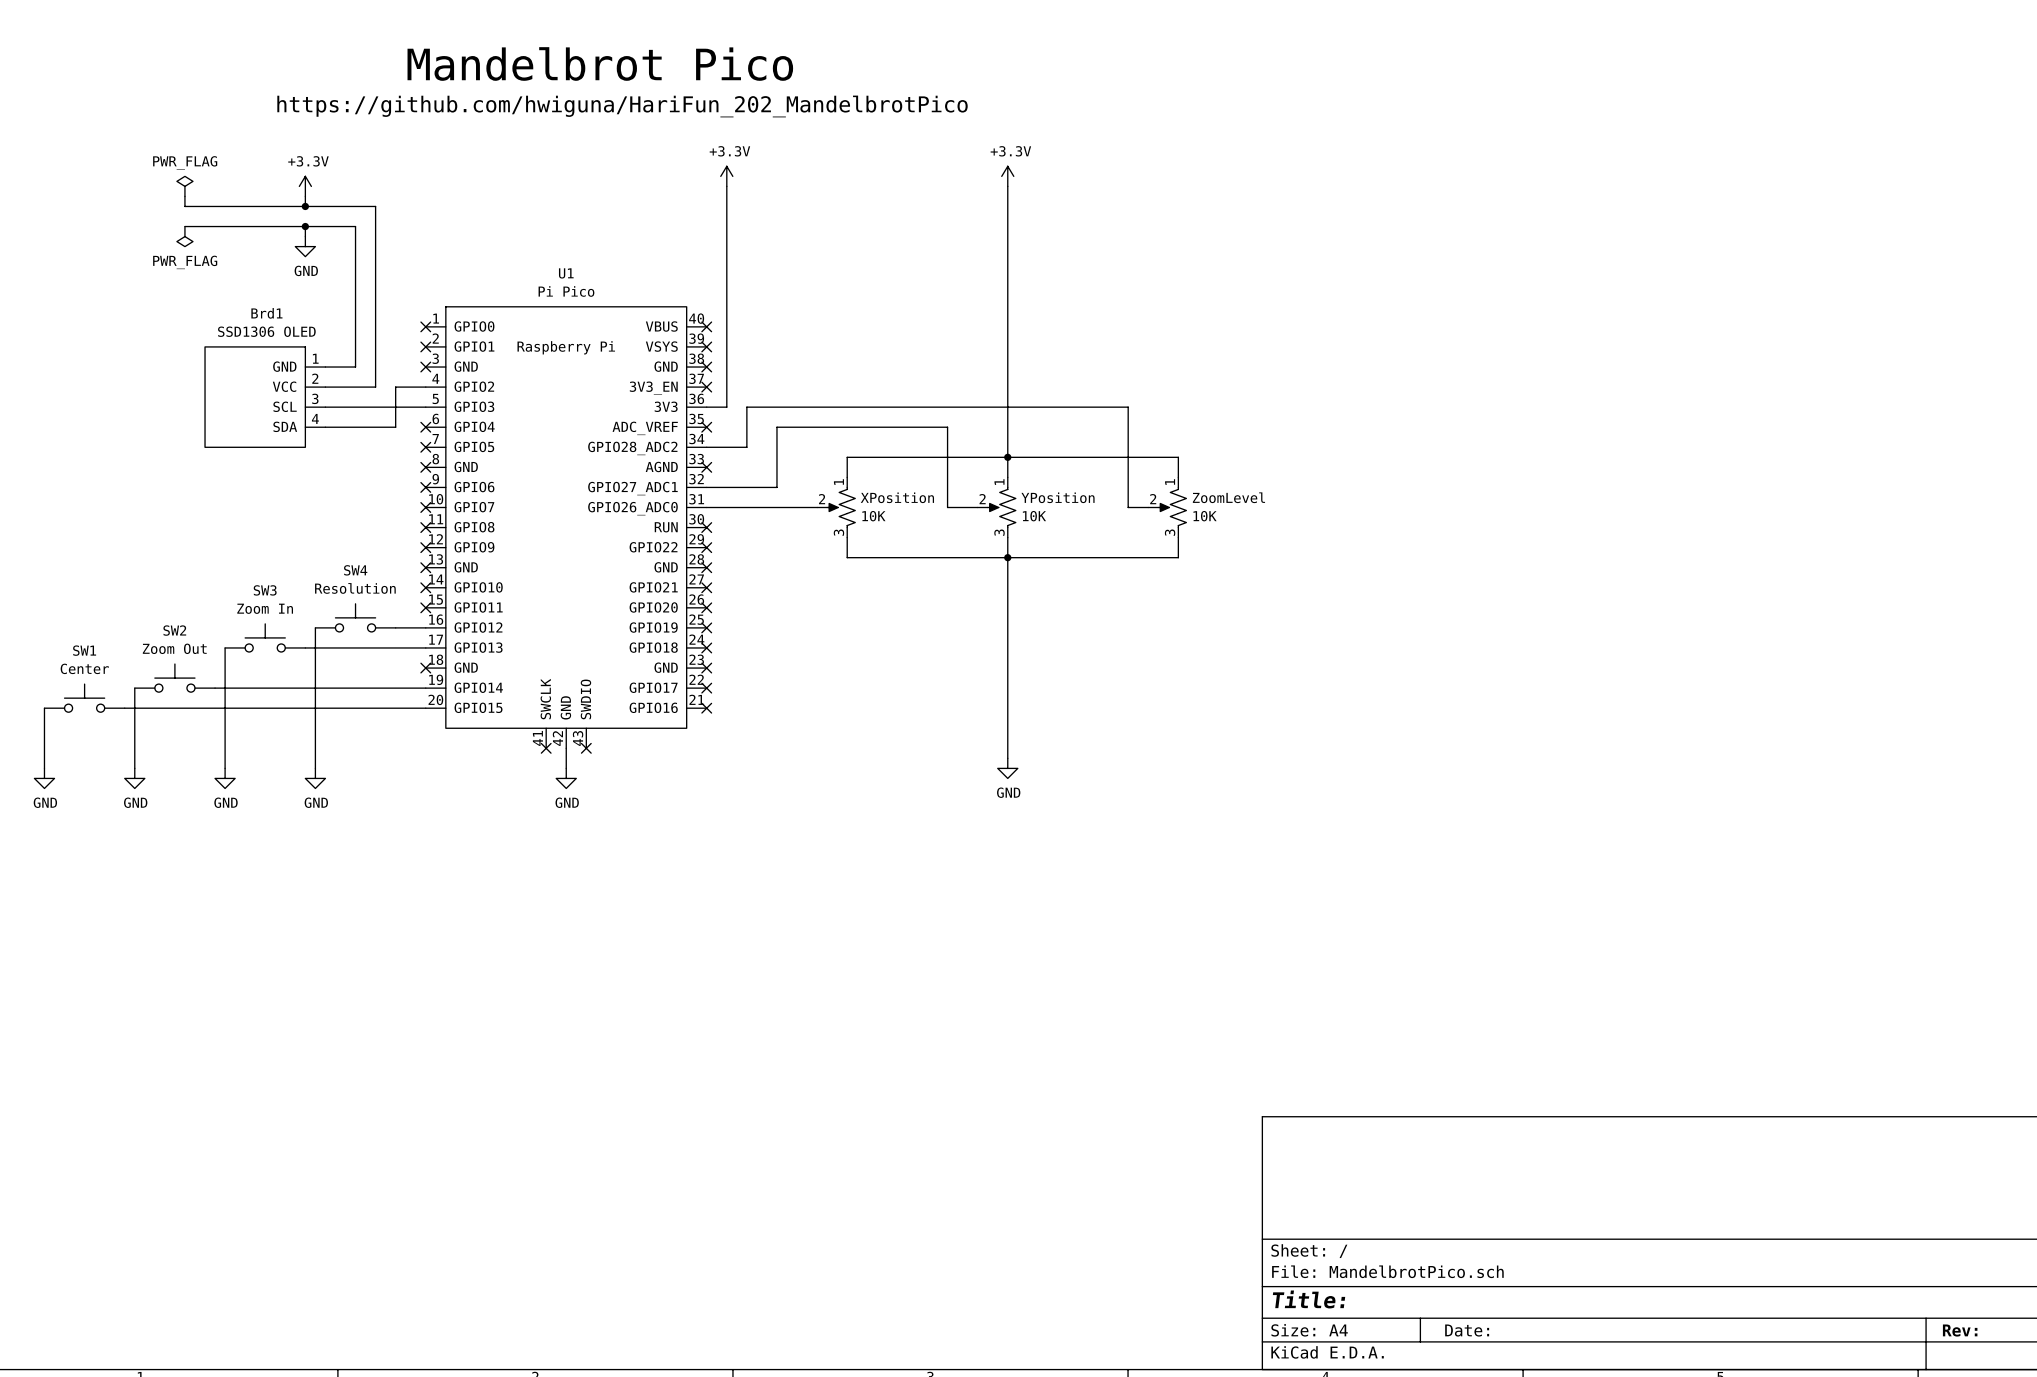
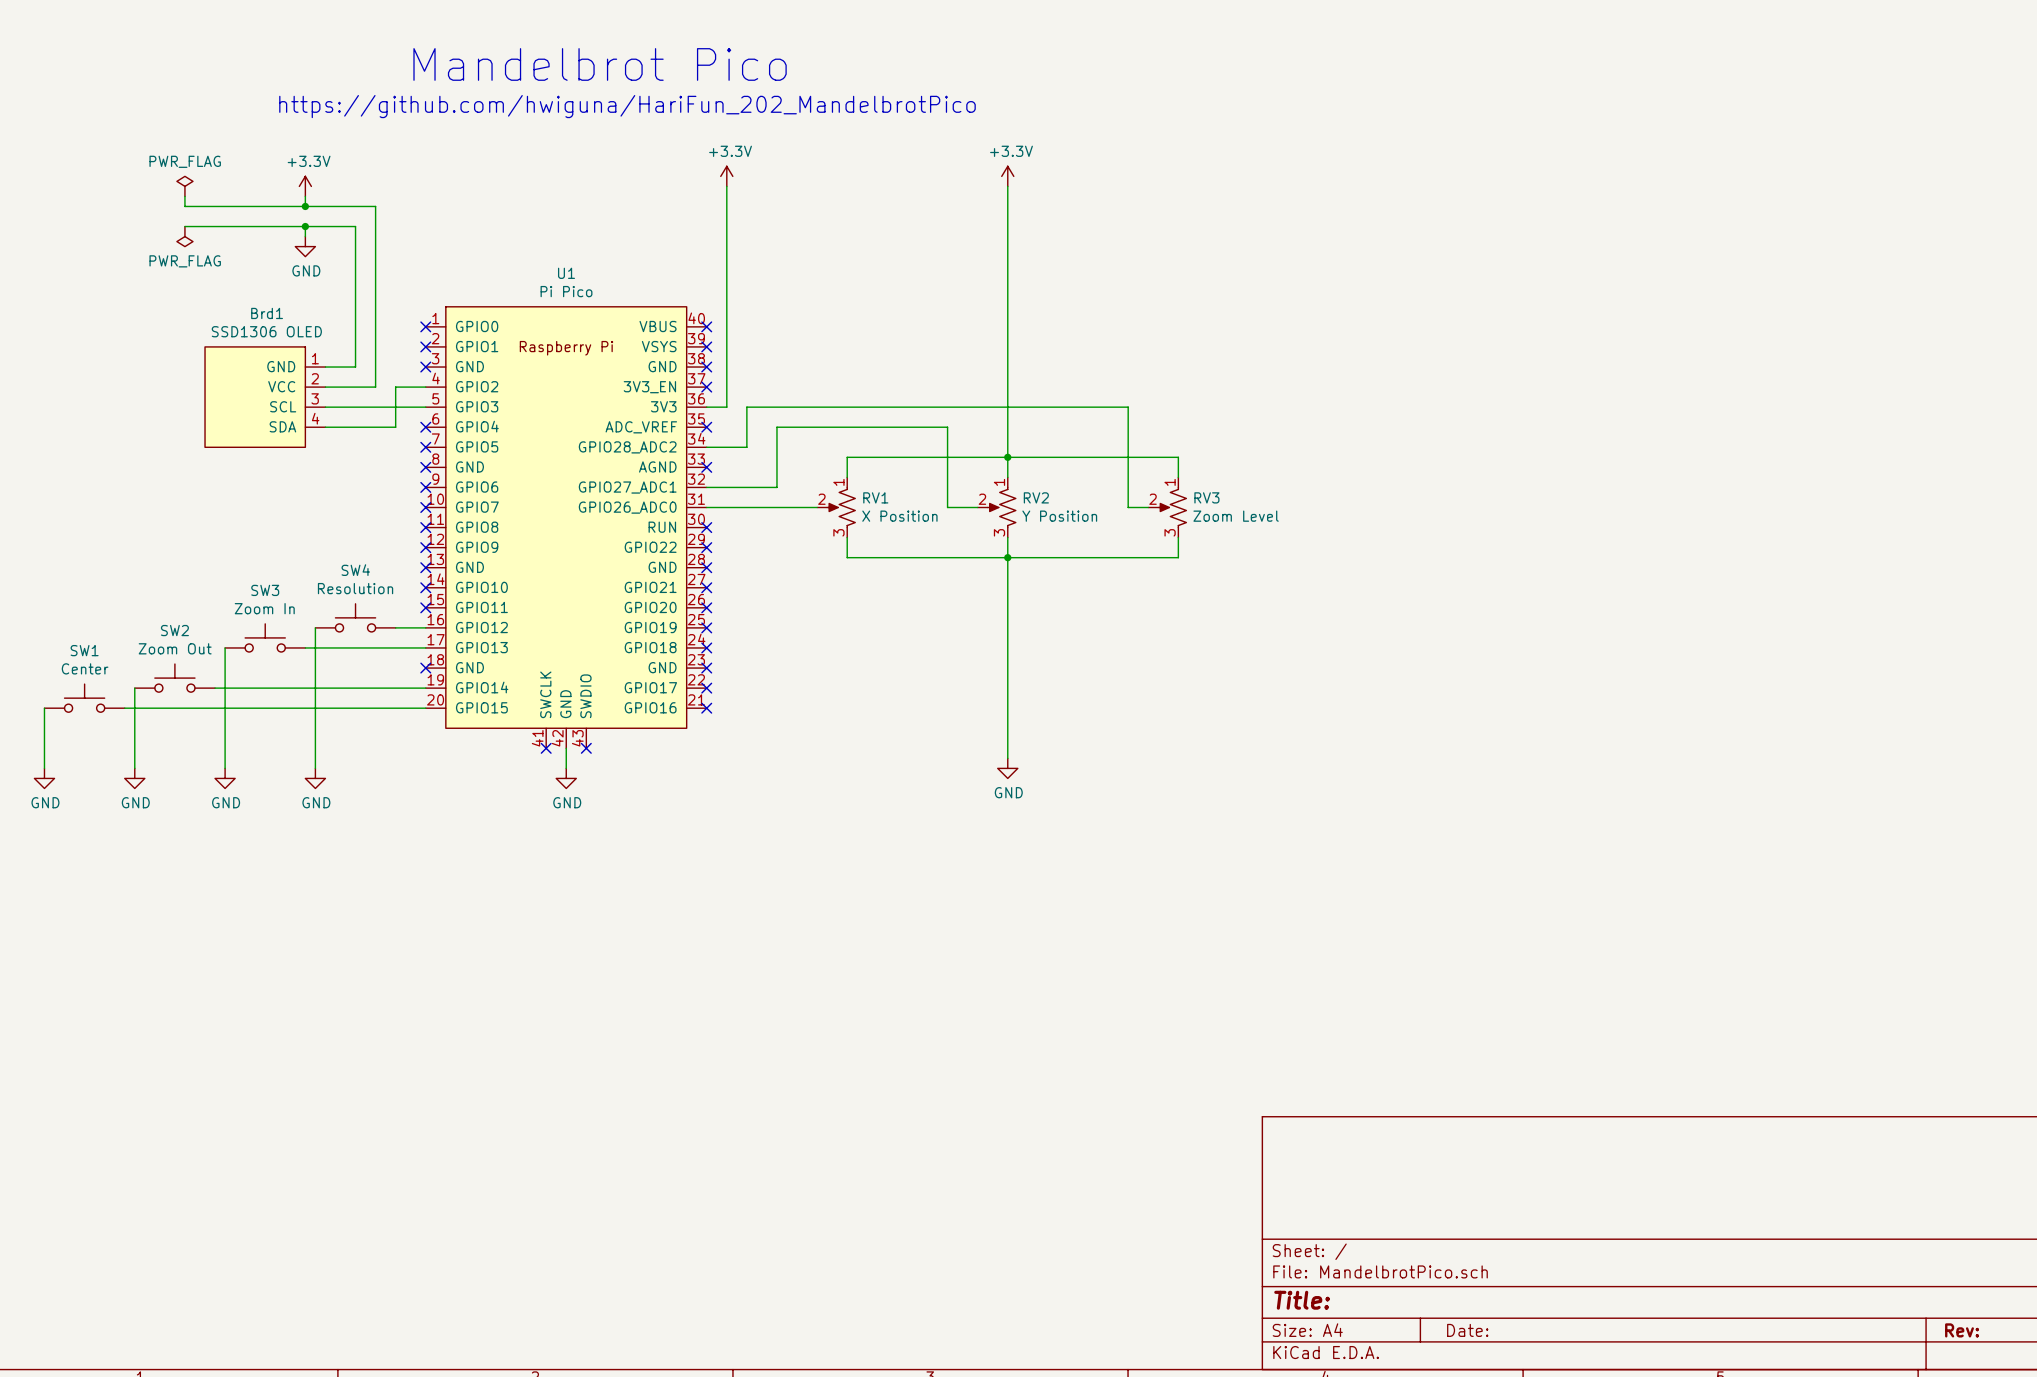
XPosition name: XPosition (897, 497) -> RV1 (875, 497)
YPosition name: YPosition (1058, 497) -> RV2 (1036, 497)
ZoomLevel name: ZoomLevel (1228, 497) -> RV3 (1206, 497)
XPosition value: 10K (873, 516) -> X Position (899, 516)
YPosition value: 10K (1034, 516) -> Y Position (1059, 516)
ZoomLevel value: 10K (1205, 516) -> Zoom Level (1236, 516)

